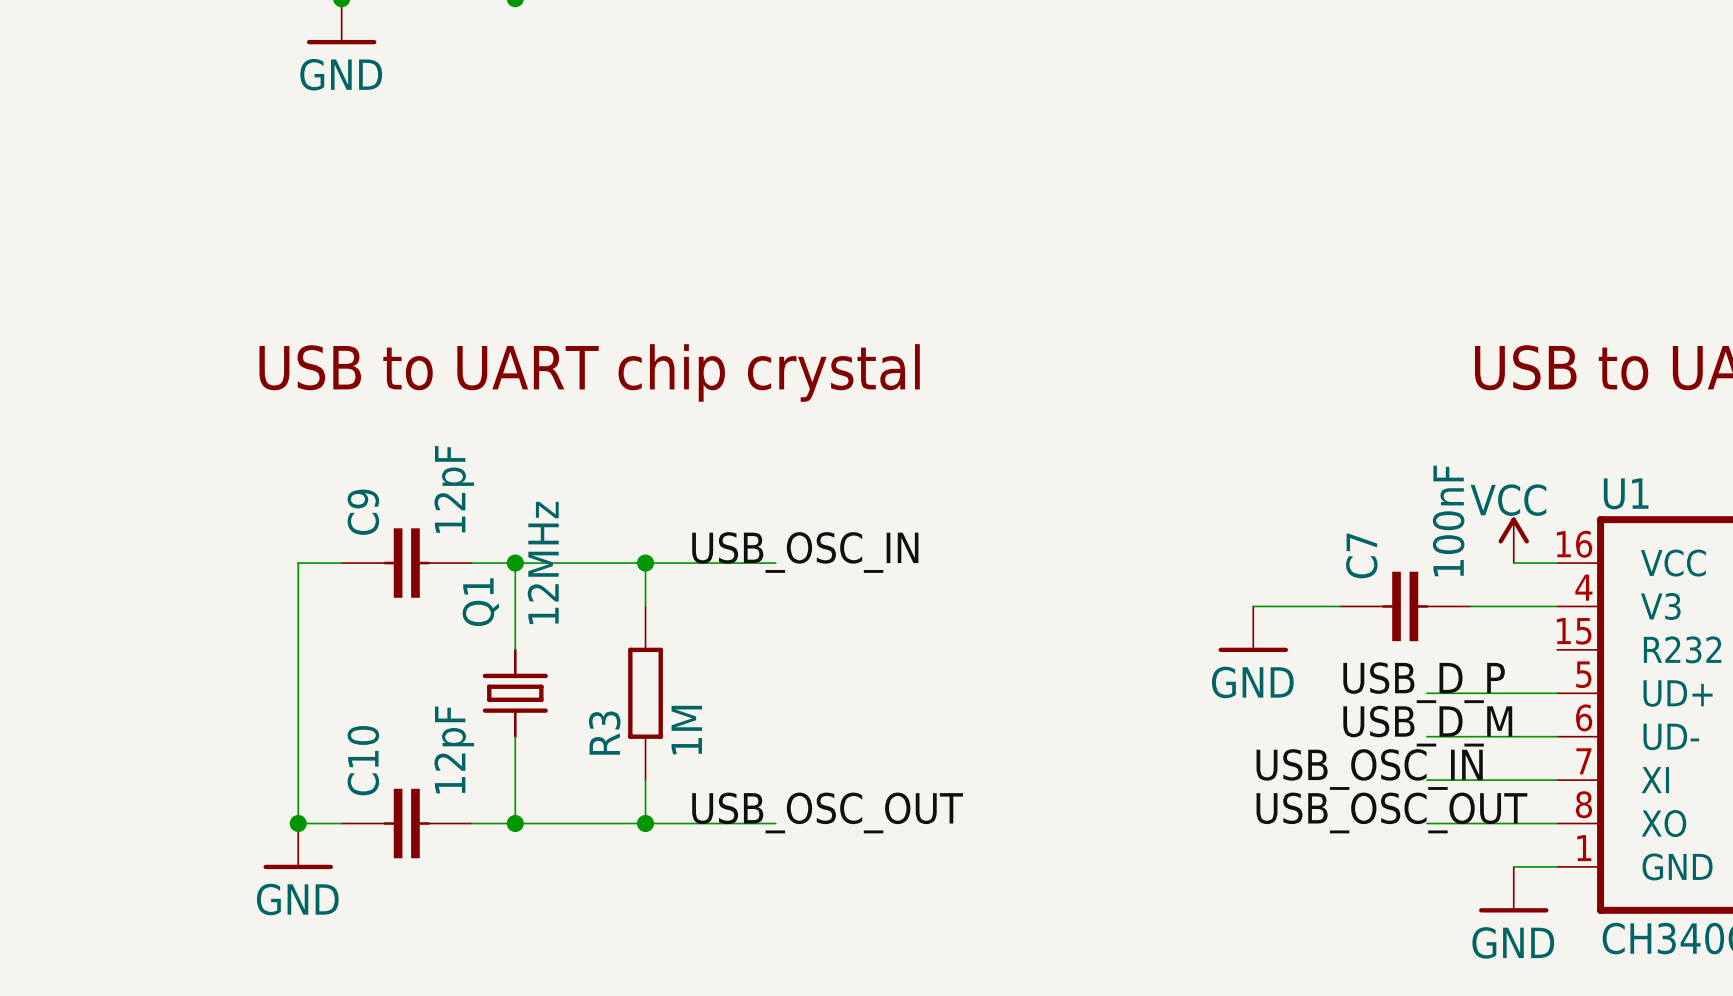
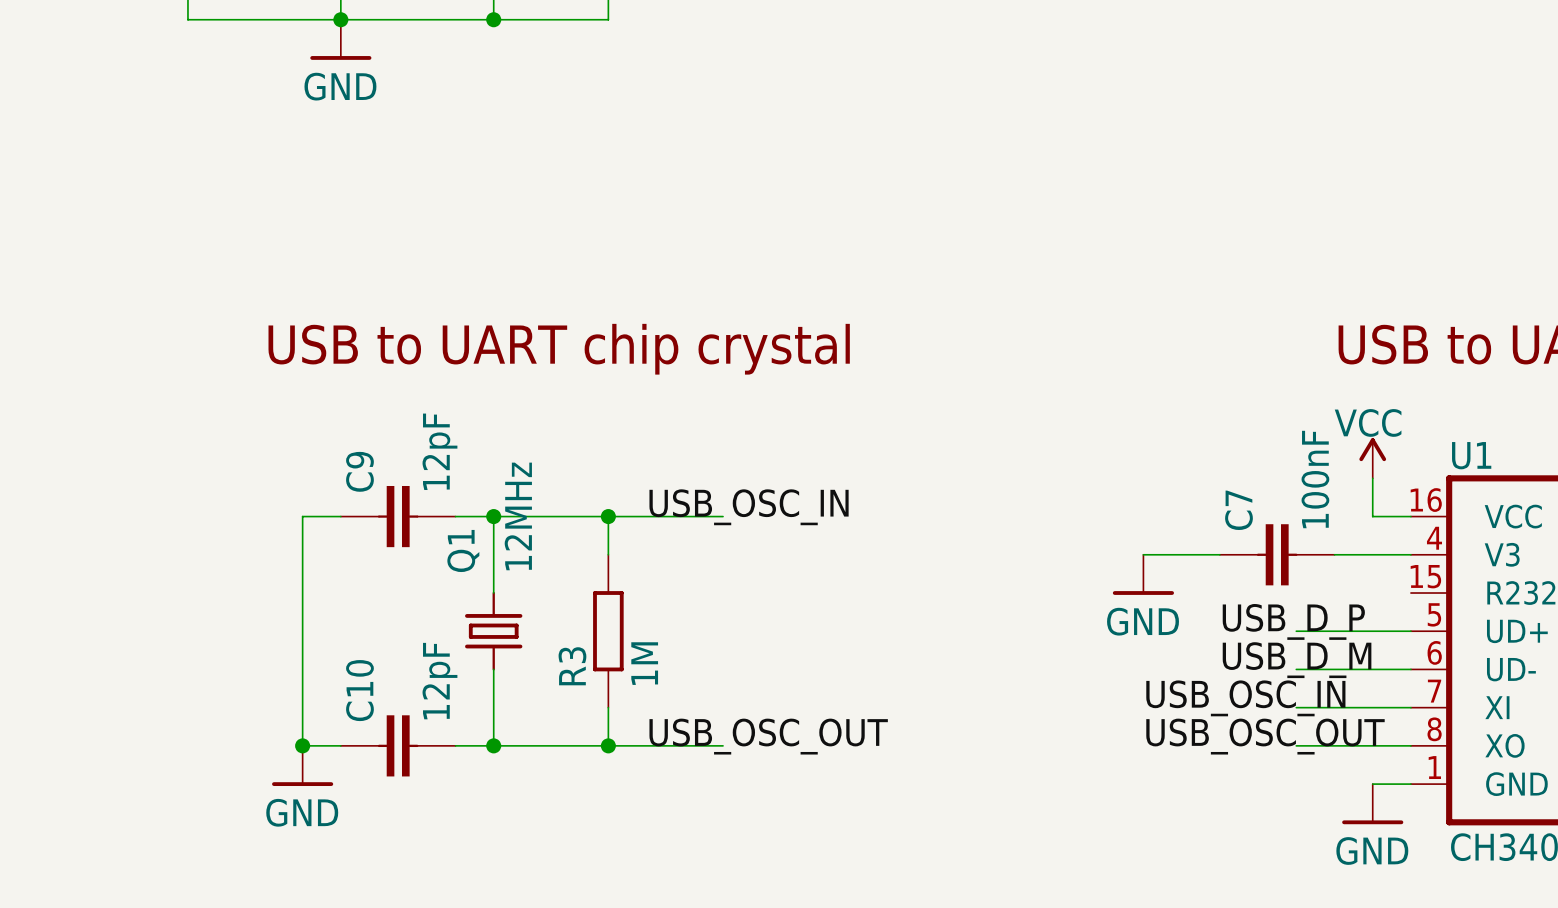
power symbol position: VCC (1513, 540) -> VCC (1372, 458)

